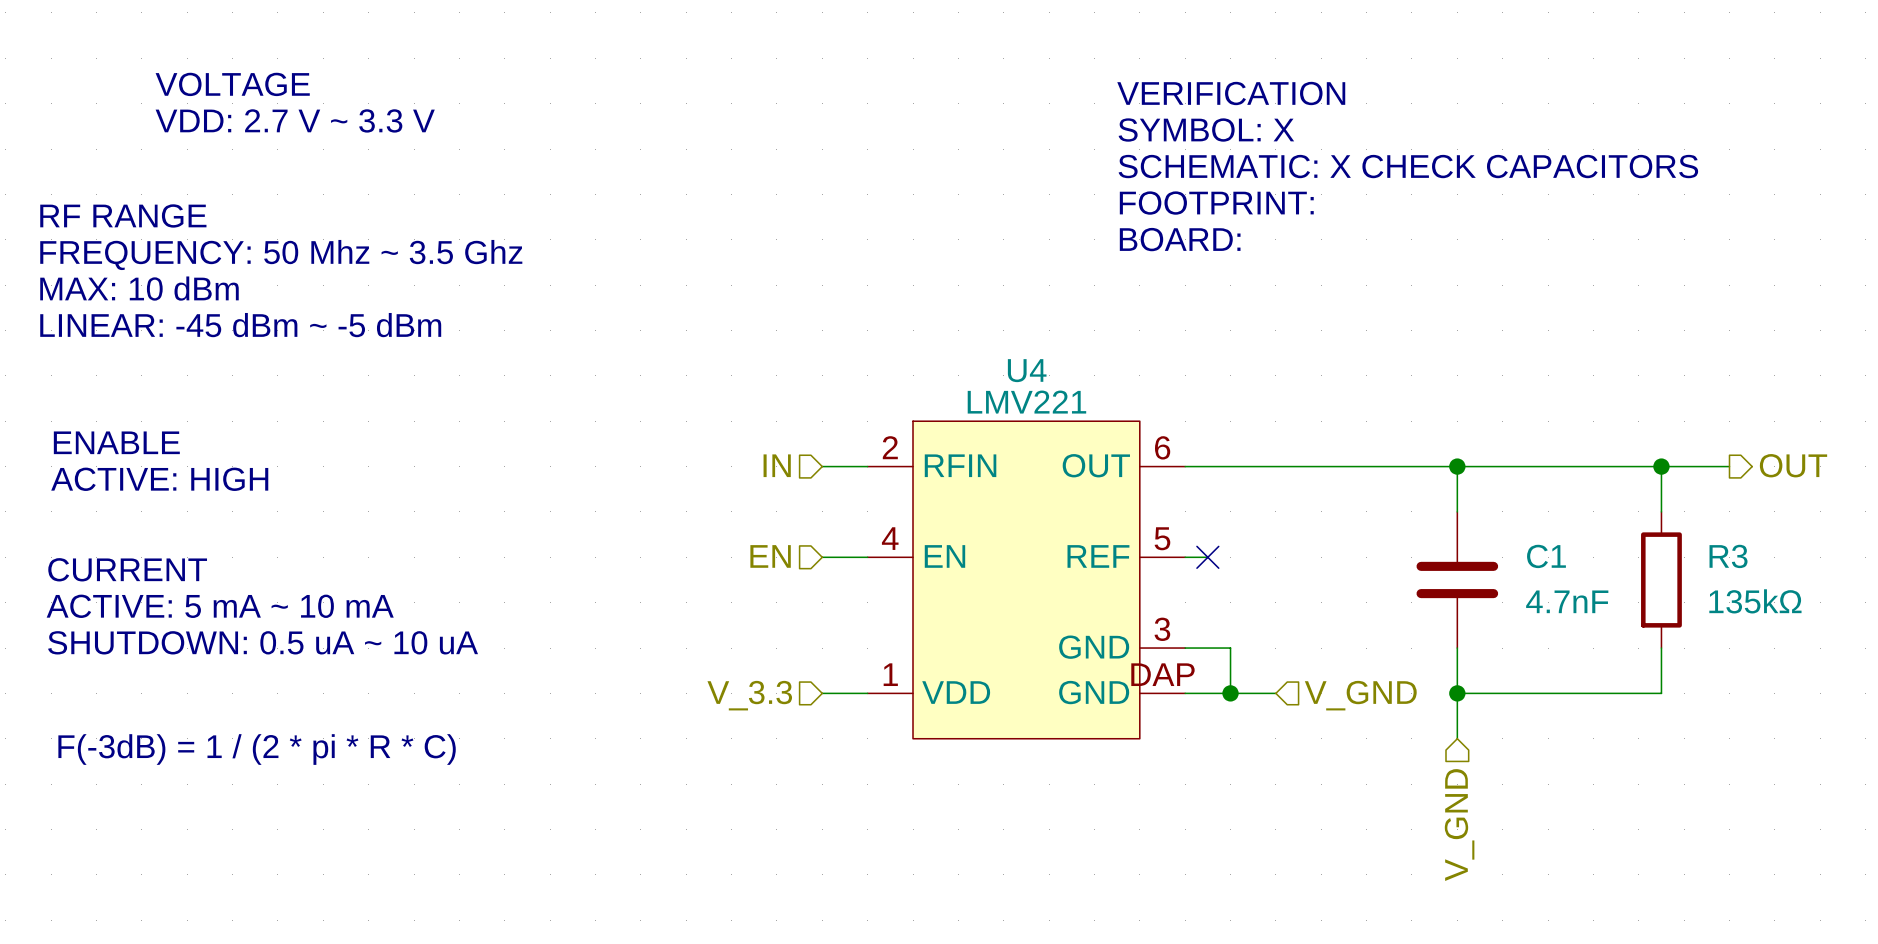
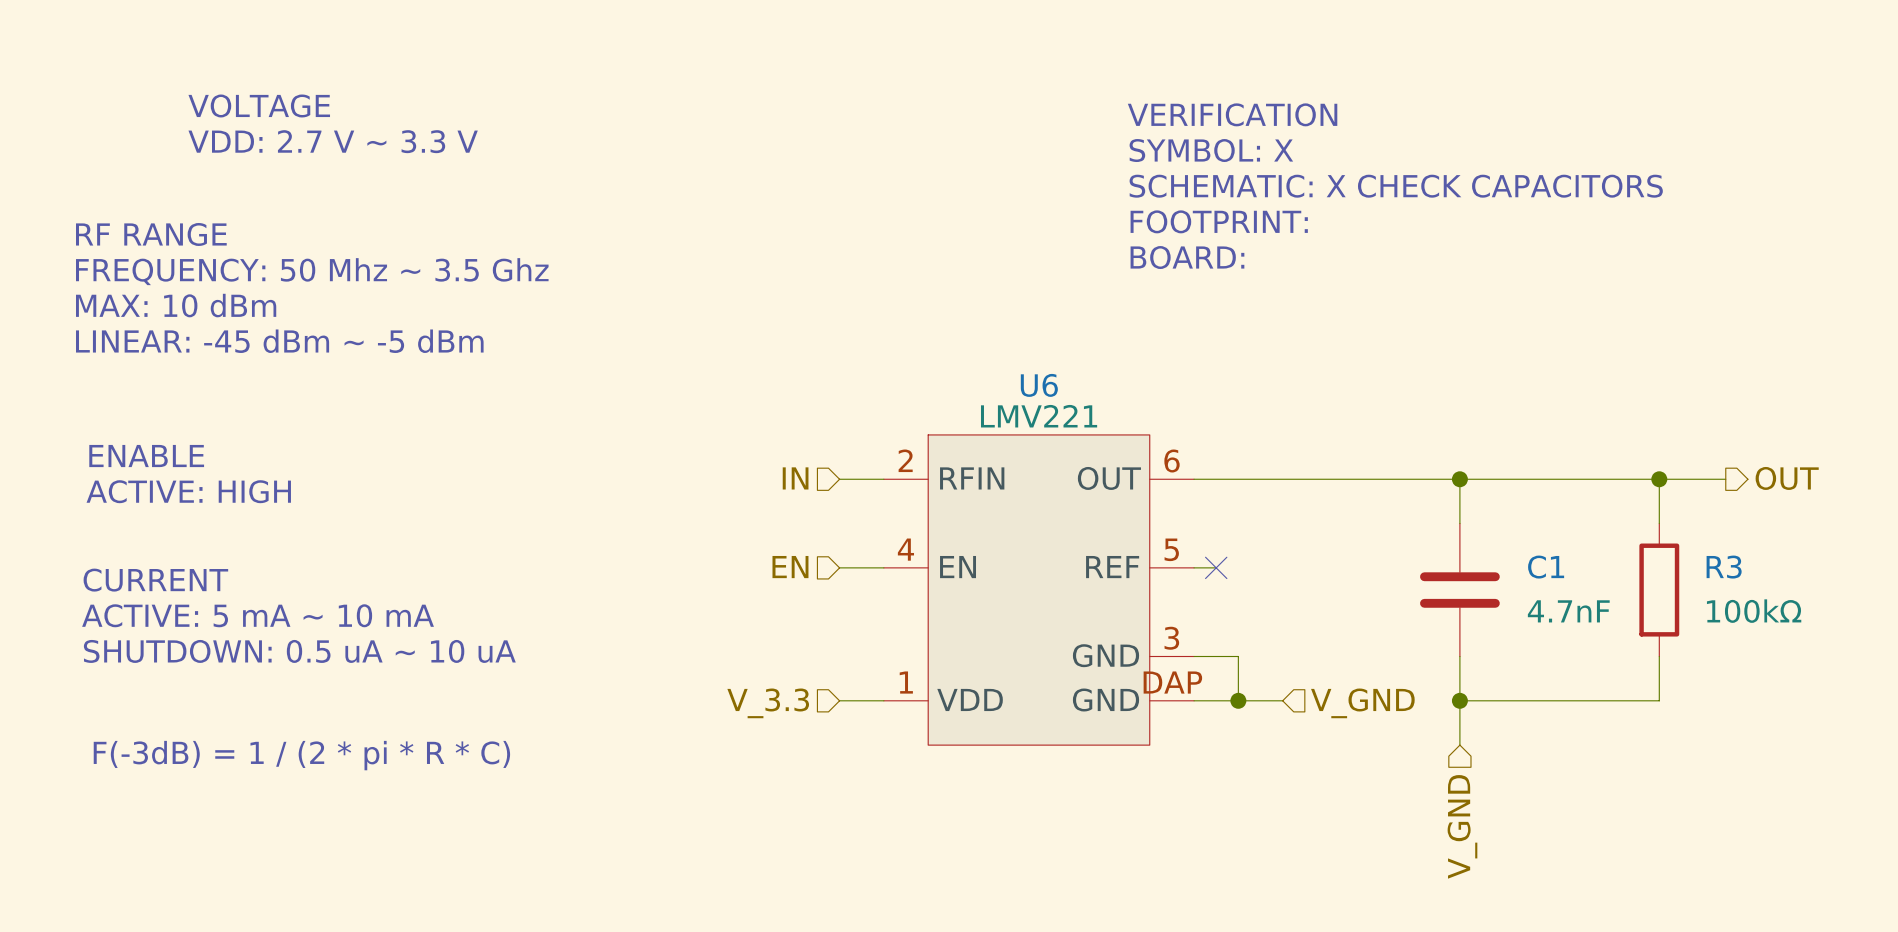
U4 name: U4 (1027, 370) -> U6 (1039, 385)
R3 value: 135kΩ (1755, 601) -> 100kΩ (1754, 611)

